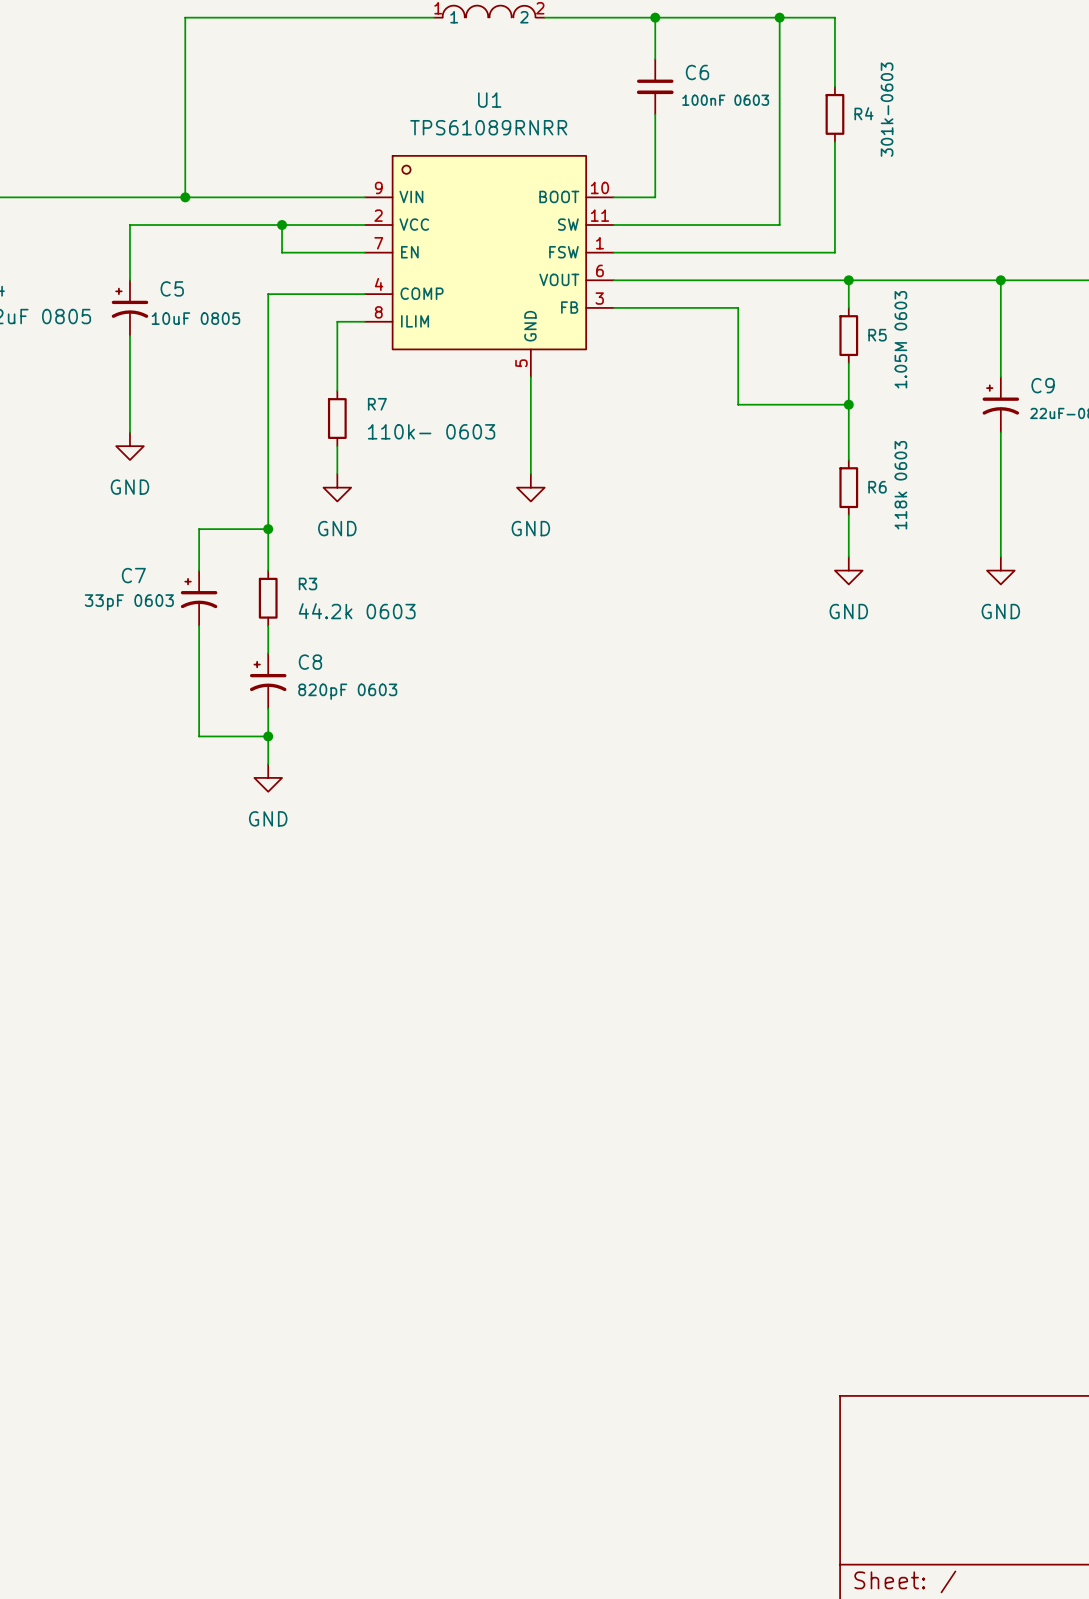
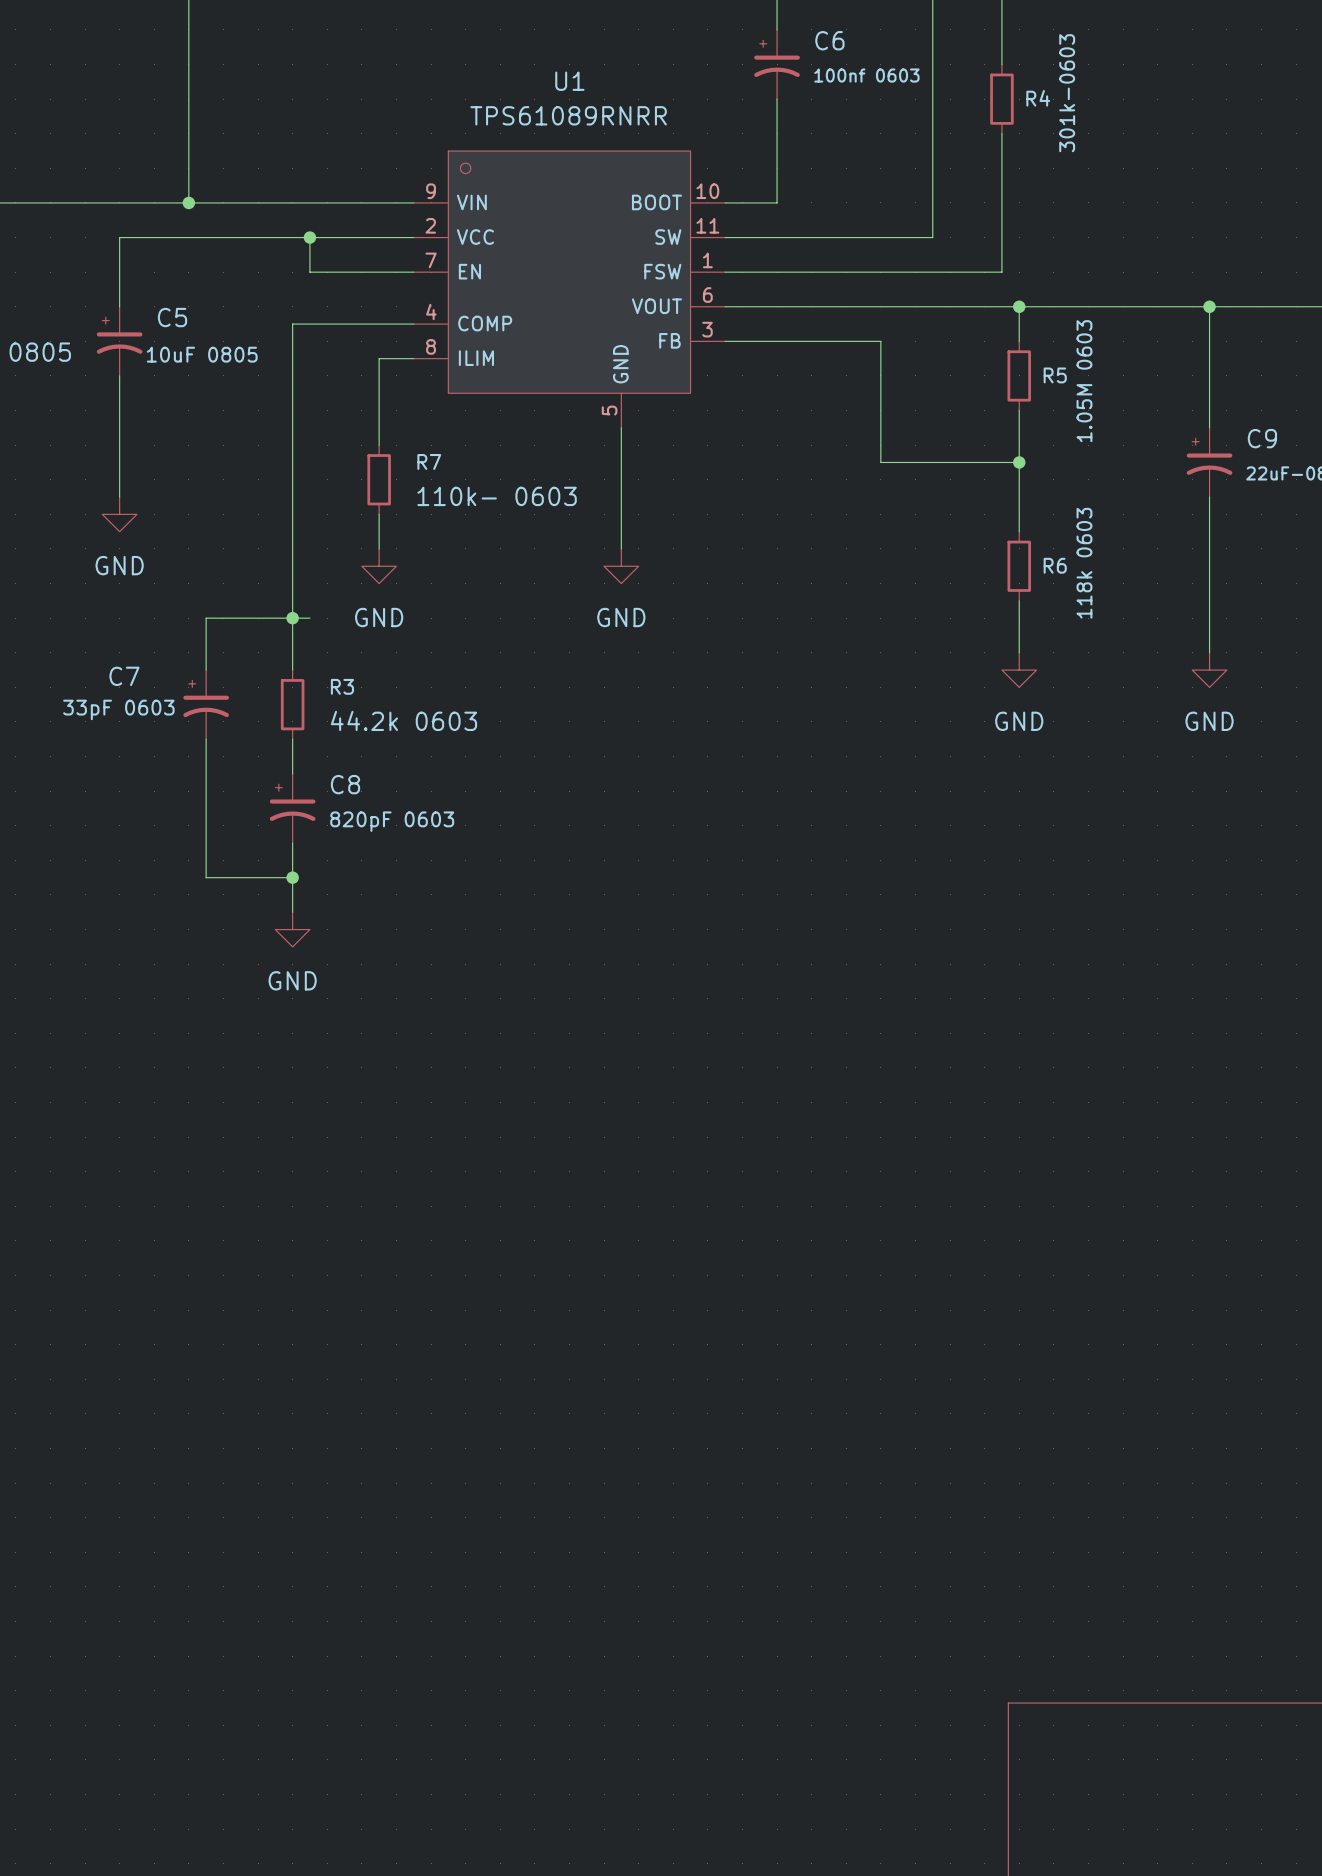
C6 symbol: [636, 59, 674, 115] -> [754, 29, 800, 100]
C6 value: 100nF 0603 (725, 100) -> 100nf 0603 (866, 75)
wire: none -> (292, 618) (309, 618)

